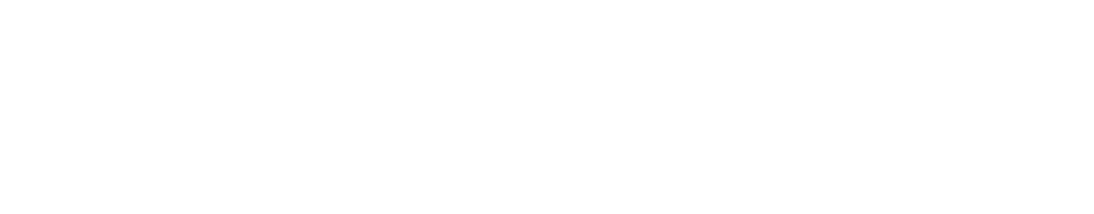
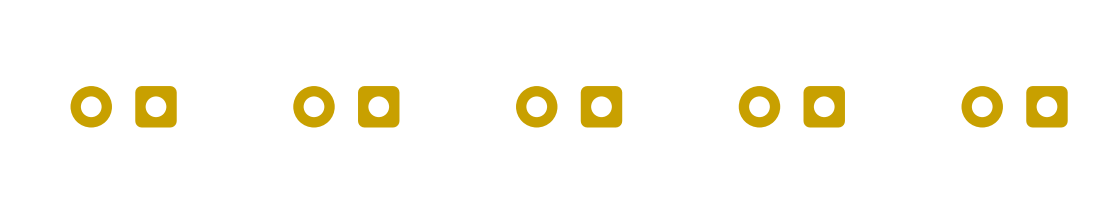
part: none -> (123, 106)
part: none -> (346, 106)
part: none -> (569, 106)
part: none -> (791, 106)
part: none -> (1014, 106)

